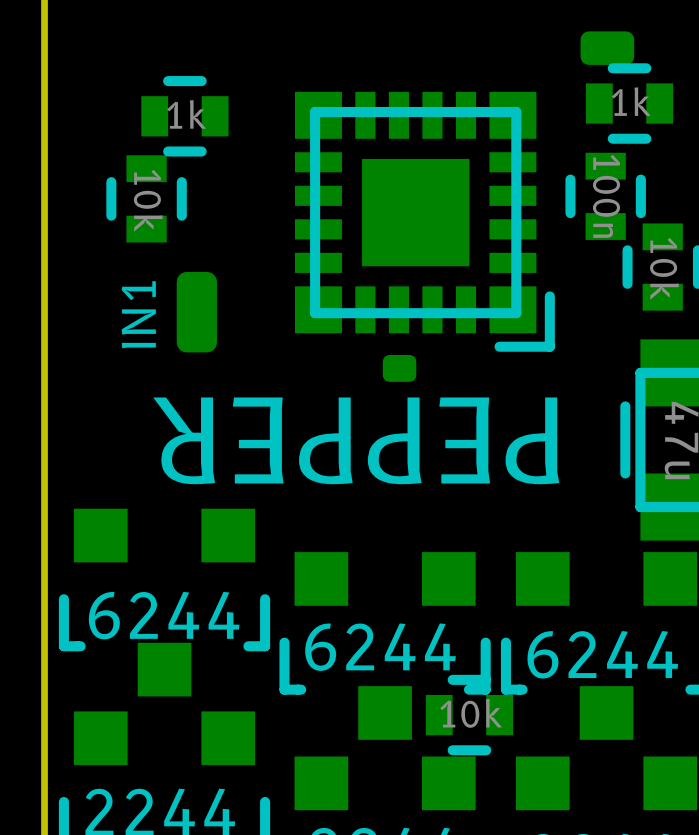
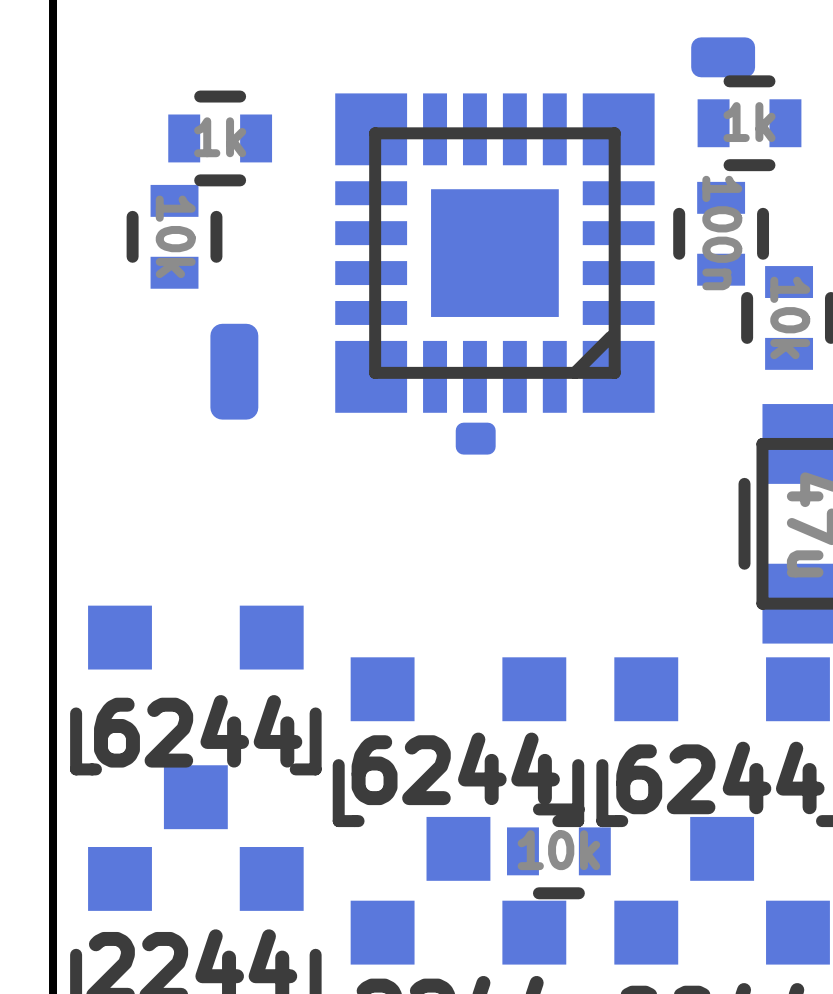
part footprint: [294, 91, 555, 352] -> [335, 93, 655, 413]
text: IN1 (138, 314) -> none
text: PEPPER (356, 440) -> none

